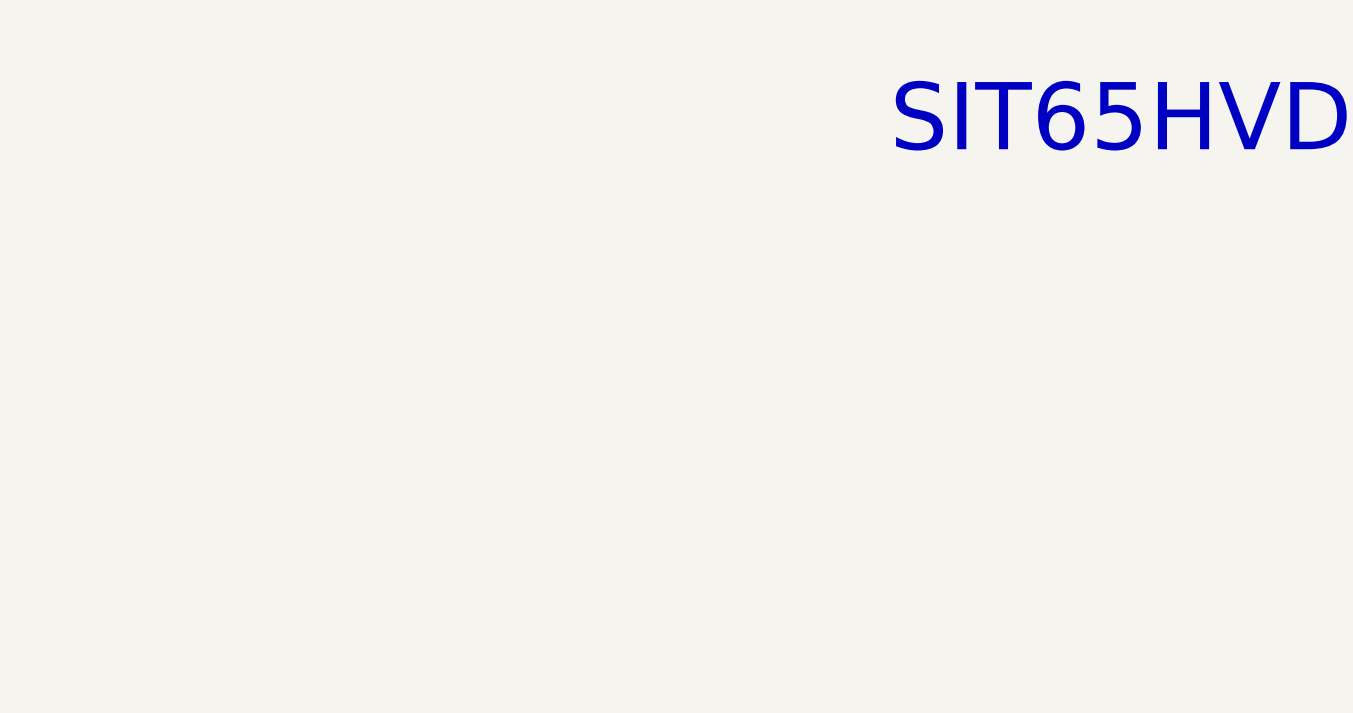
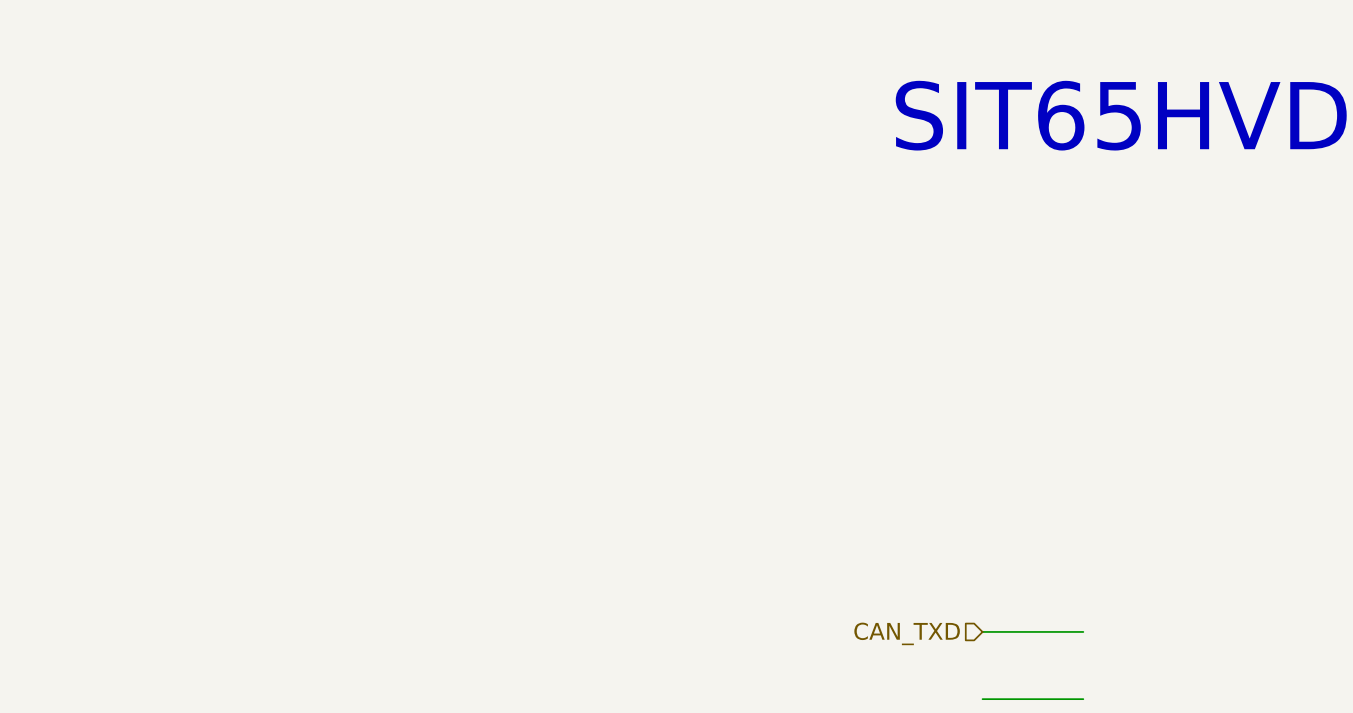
wire: none -> (982, 631) (1083, 631)
hierarchical label: none -> CAN_TXD (907, 633)
wire: none -> (982, 699) (1083, 699)

